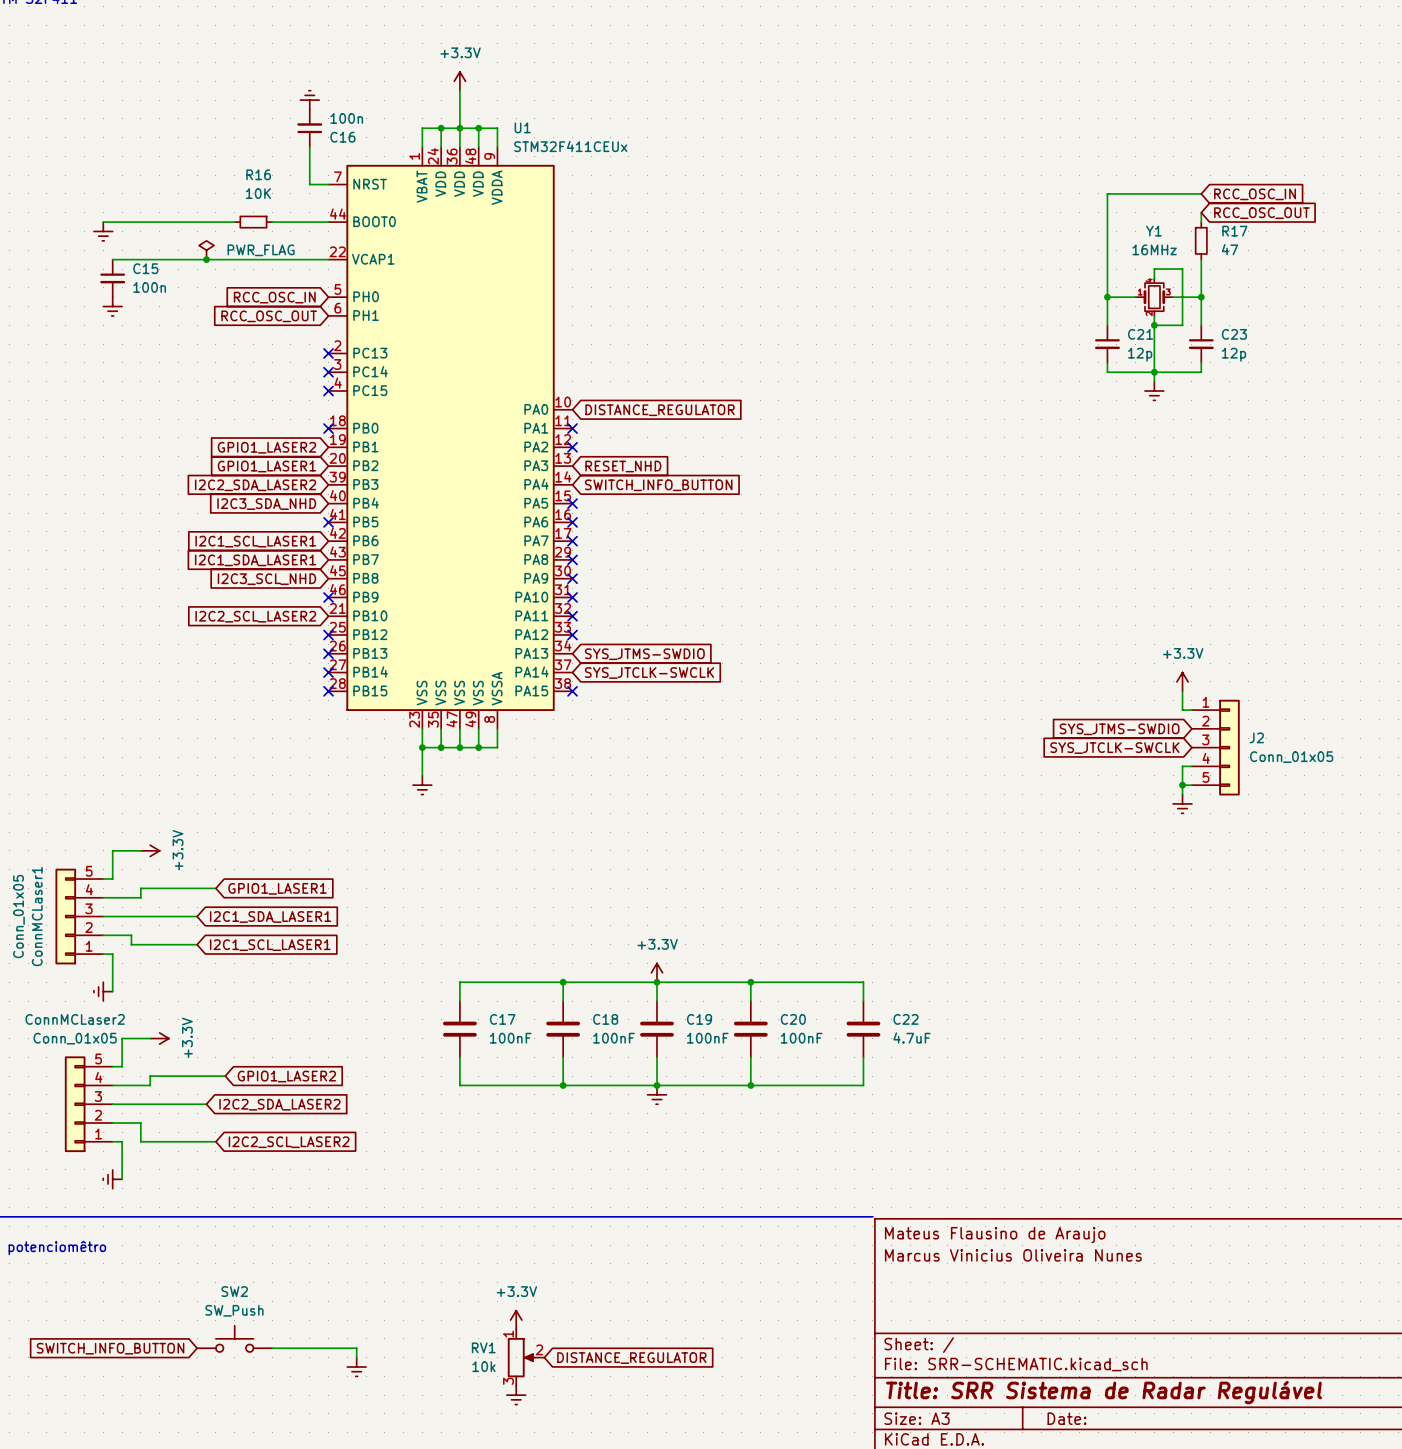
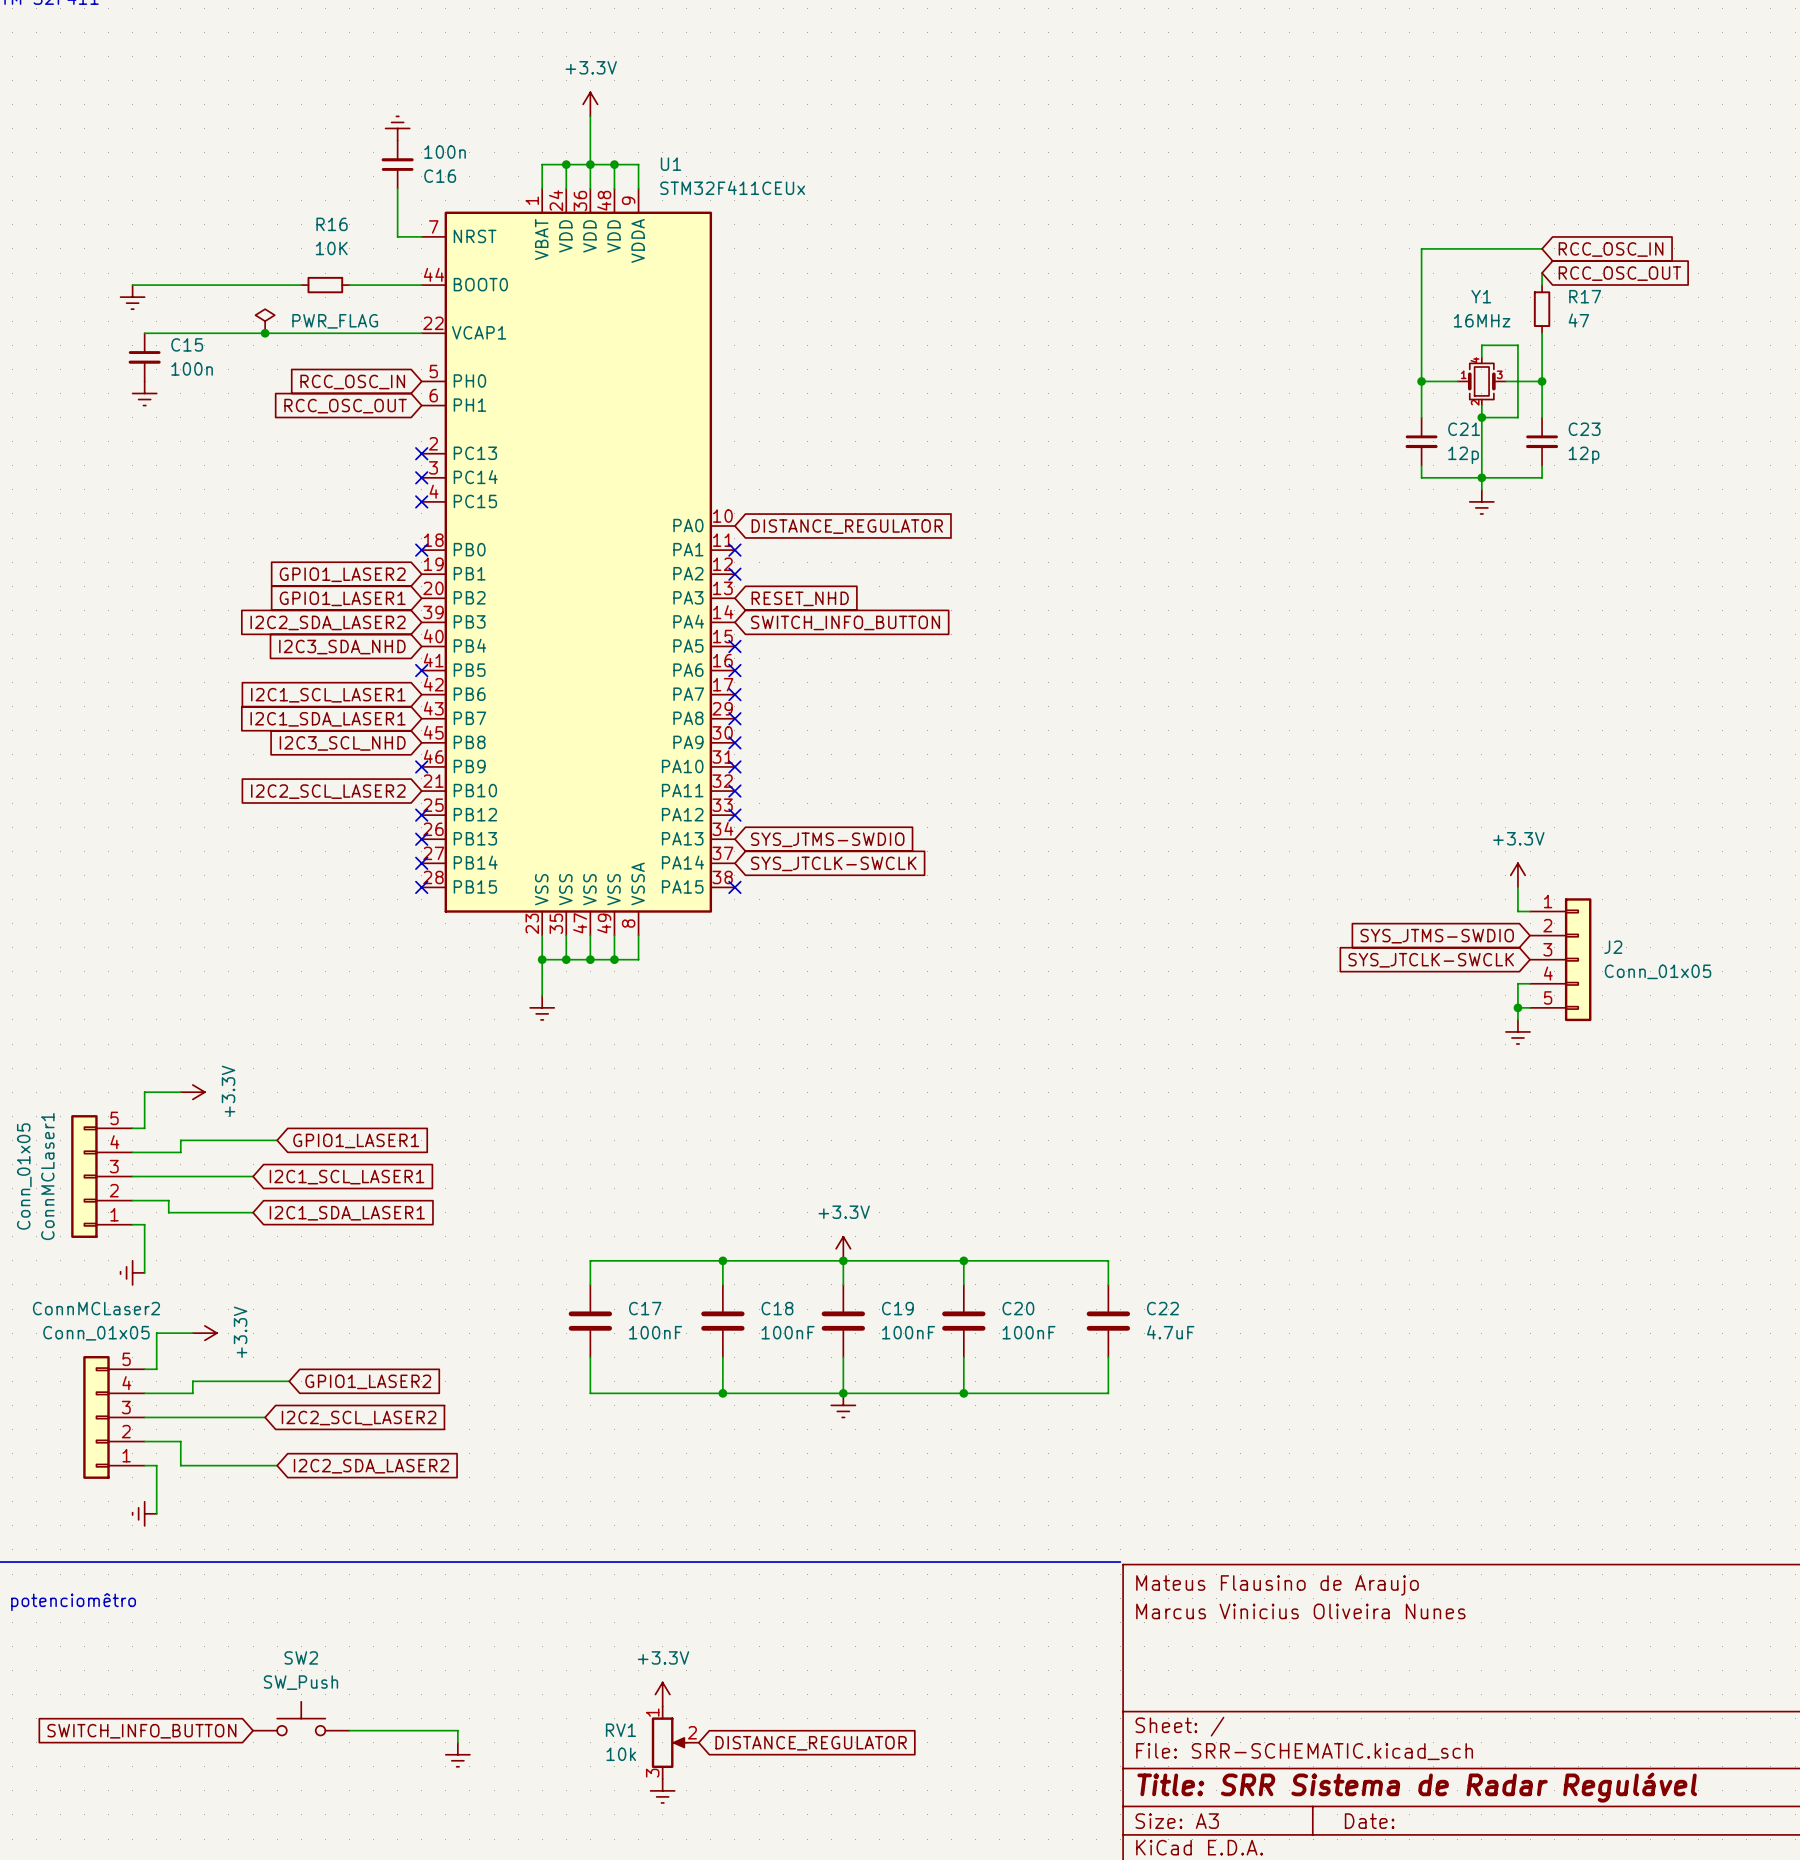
global label: I2C1_SDA_LASER1 (270, 916) -> I2C1_SCL_LASER1 (347, 1177)
global label: I2C1_SCL_LASER1 (270, 945) -> I2C1_SDA_LASER1 (347, 1213)
global label: I2C2_SDA_LASER2 (279, 1104) -> I2C2_SCL_LASER2 (359, 1418)
global label: I2C2_SCL_LASER2 (289, 1142) -> I2C2_SDA_LASER2 (371, 1466)

